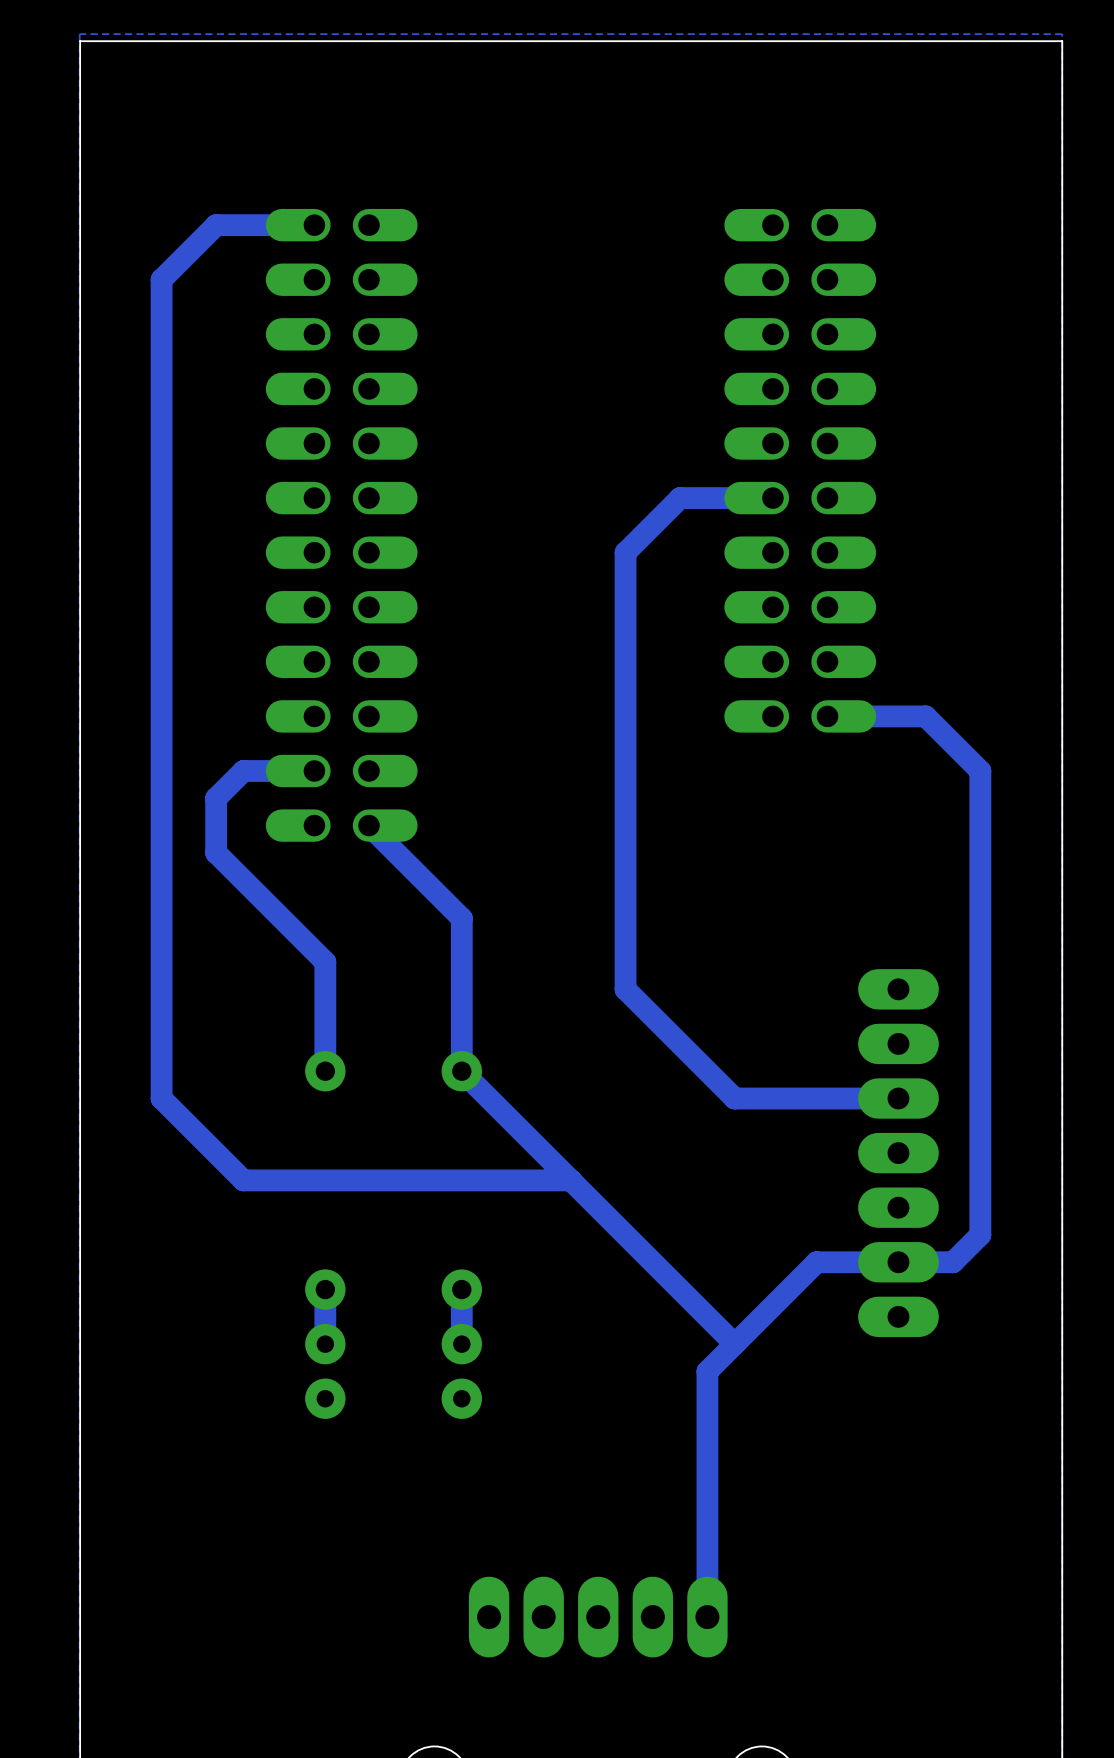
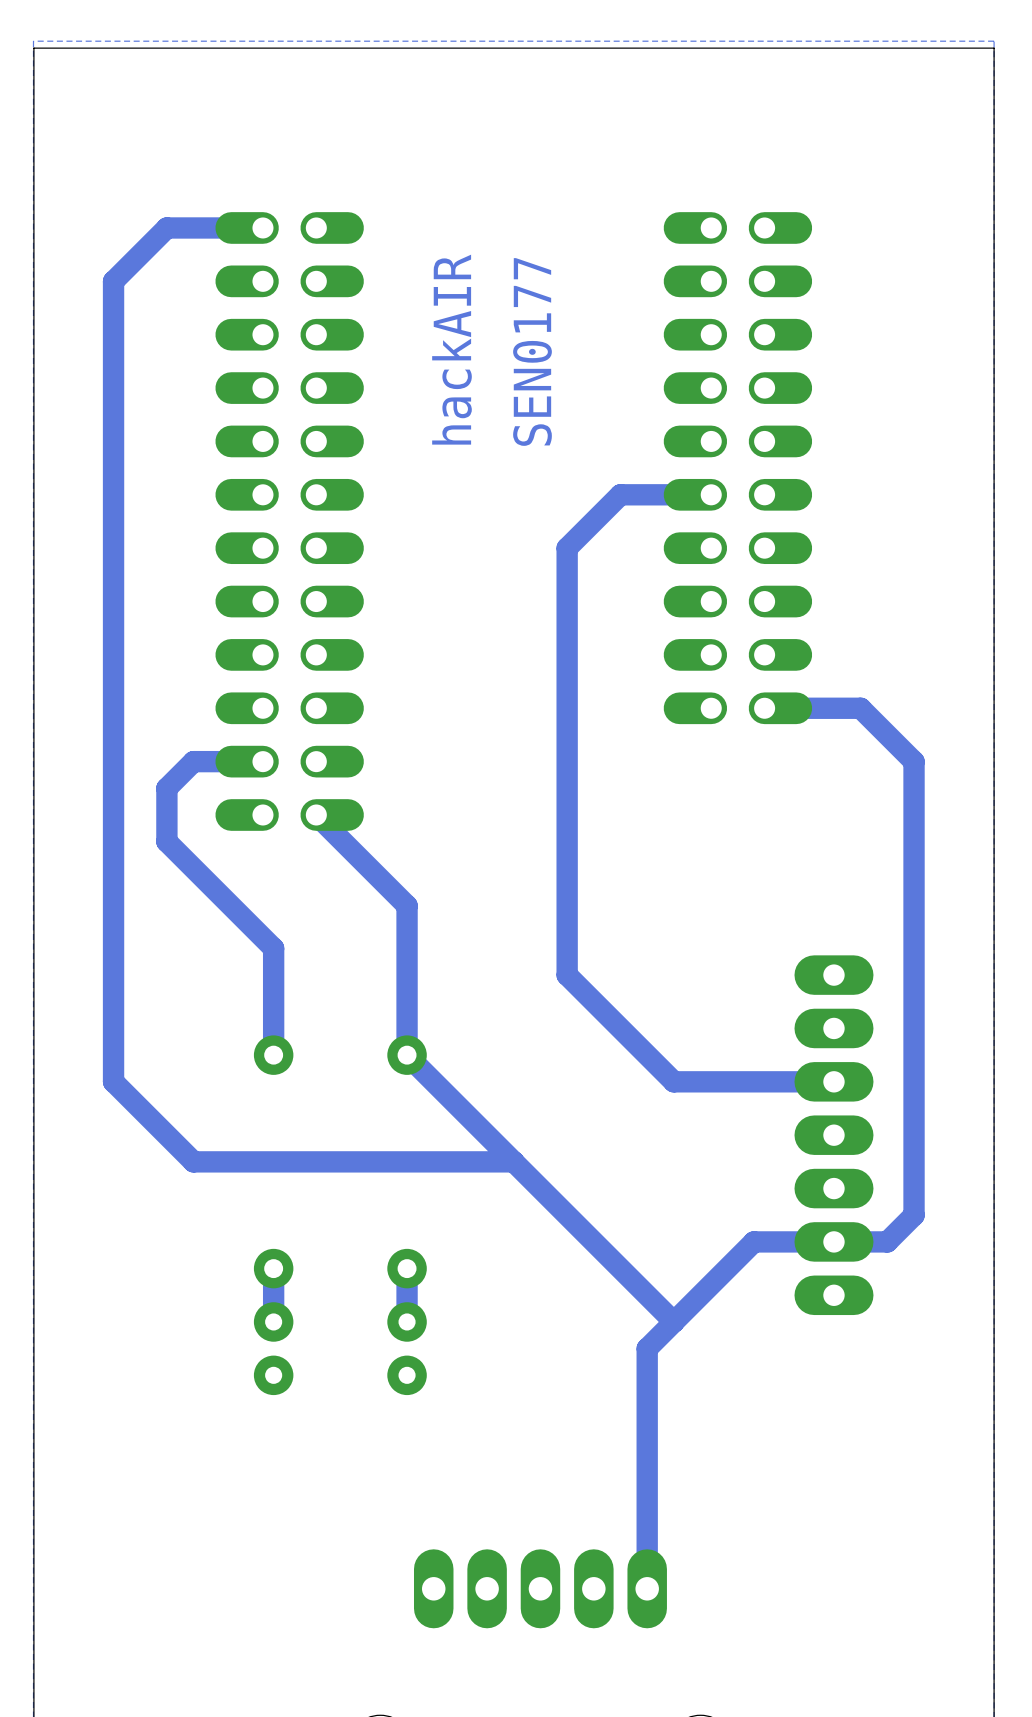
text: none -> hackAIR (451, 349)
text: none -> SEN0177 (532, 352)

